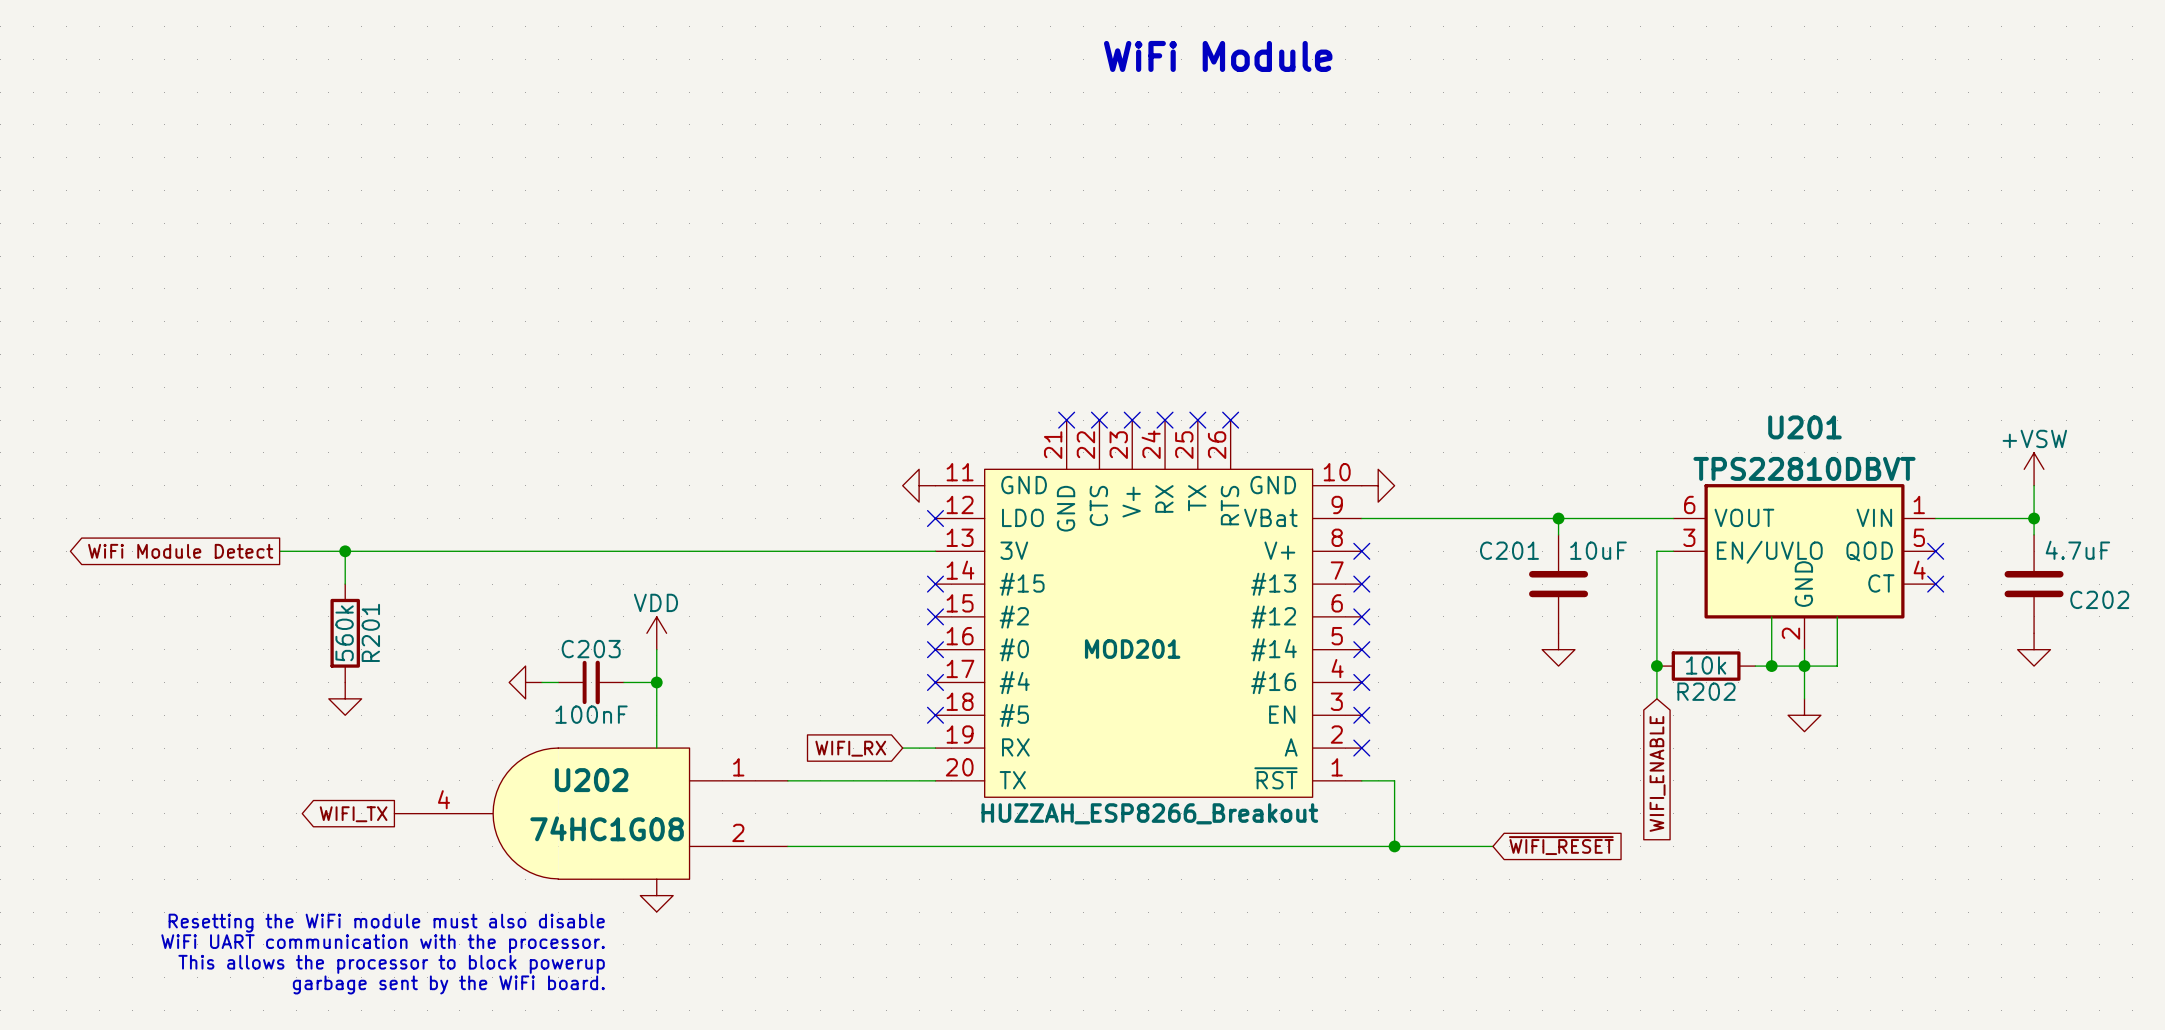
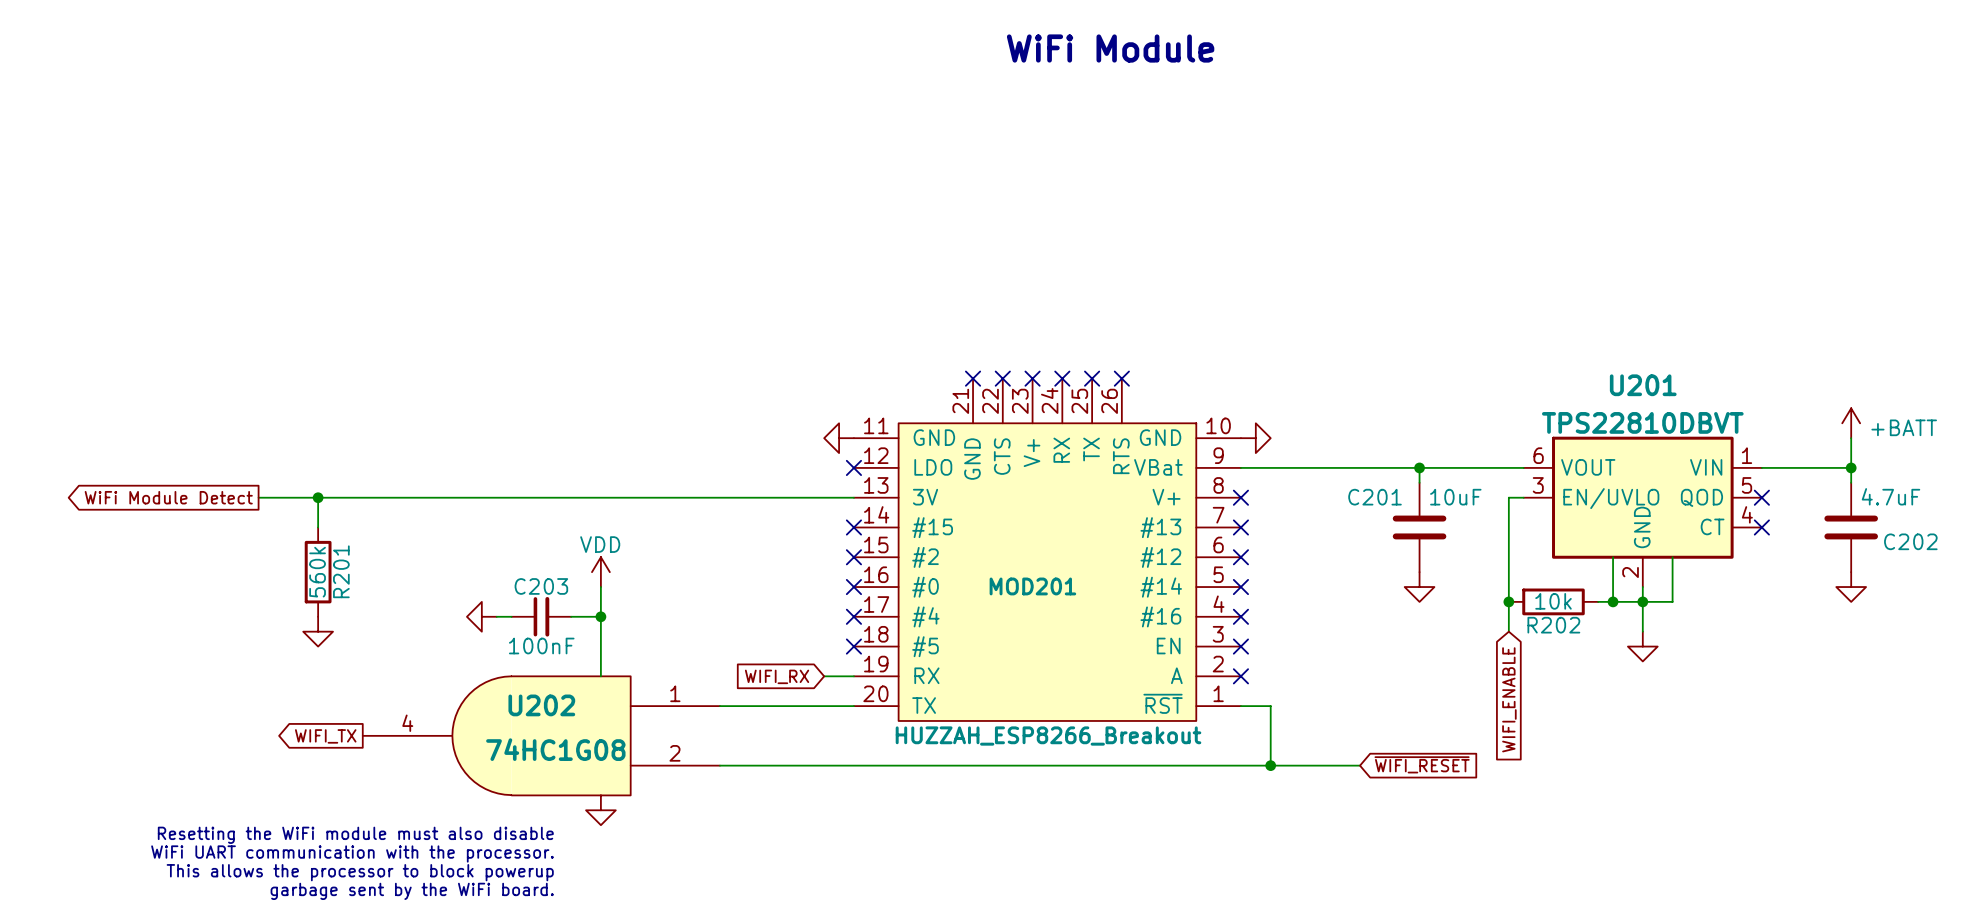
power symbol: +VSW (2034, 469) -> +BATT (1851, 423)

